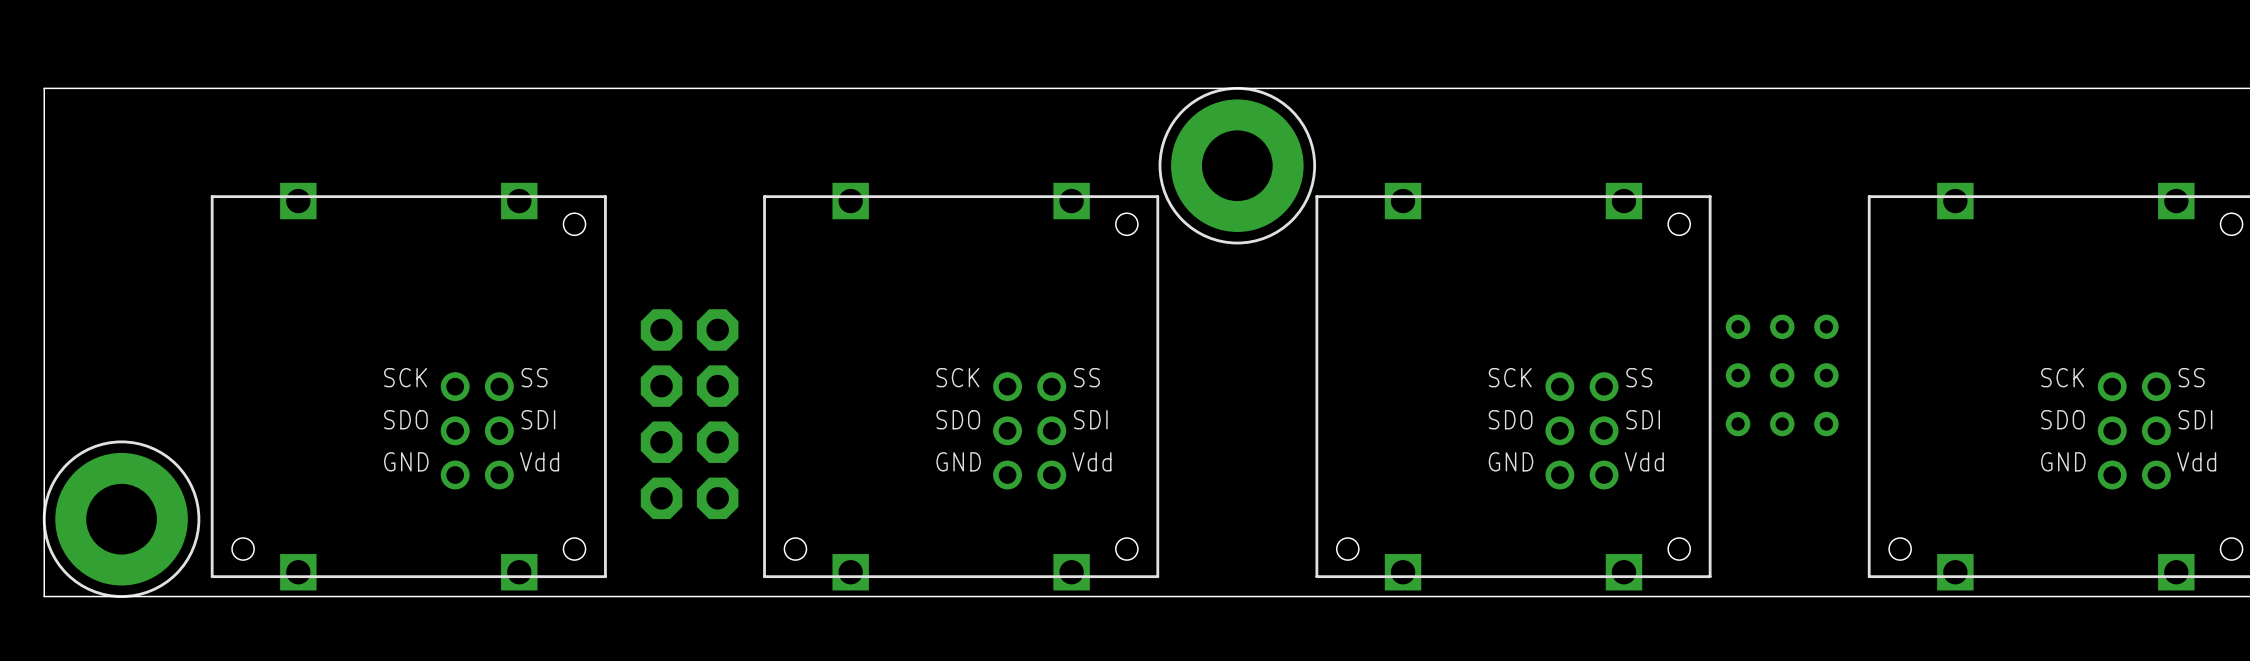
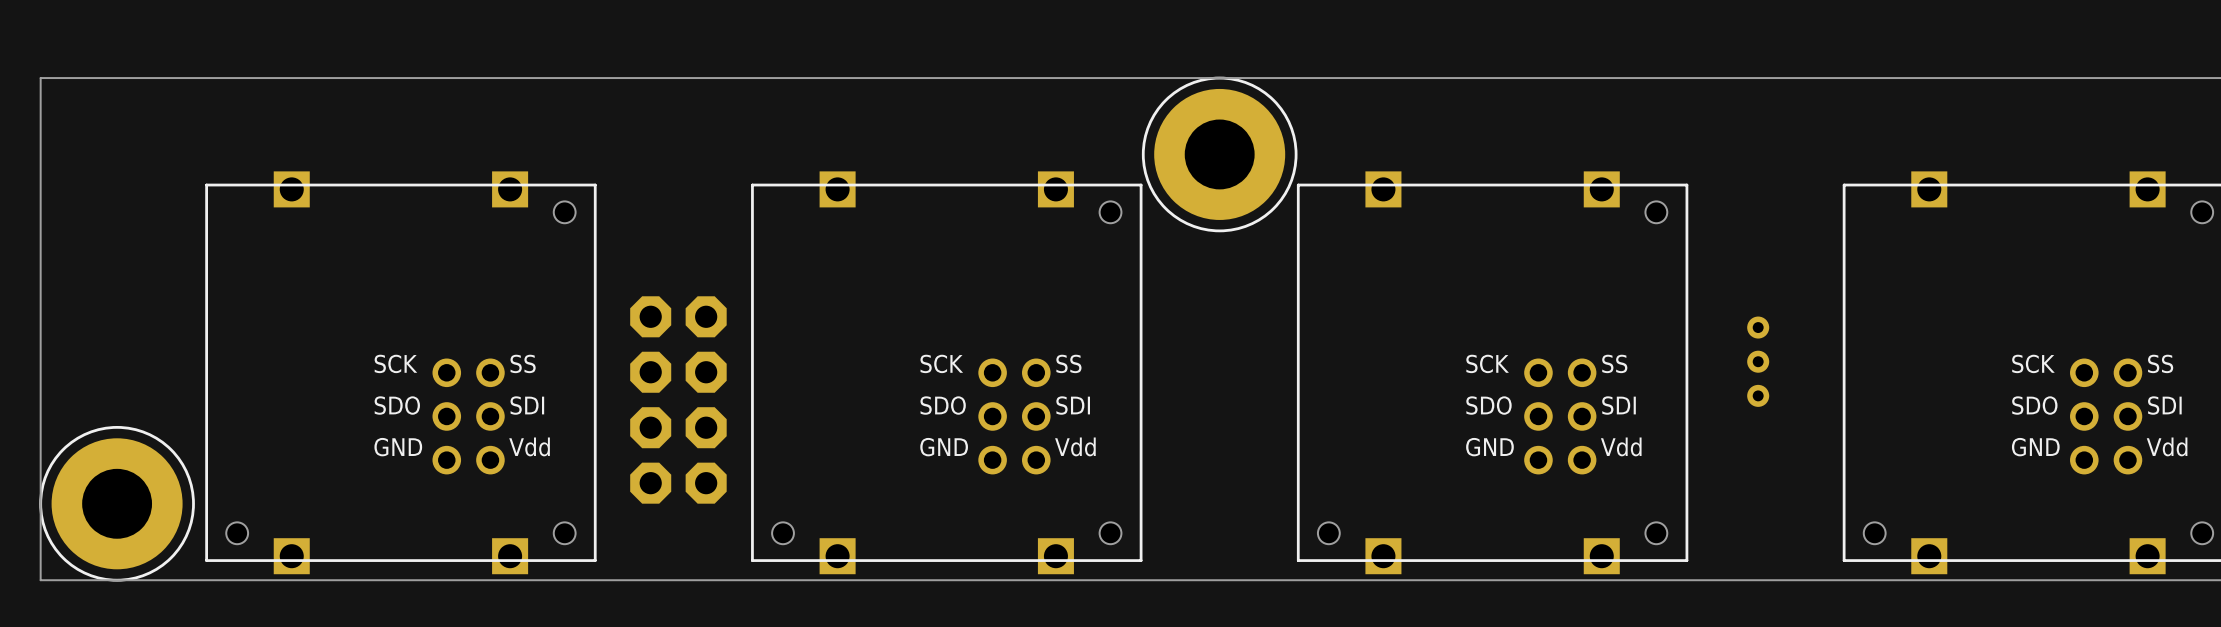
part footprint: [1725, 314, 1839, 437] -> [1747, 316, 1770, 407]

